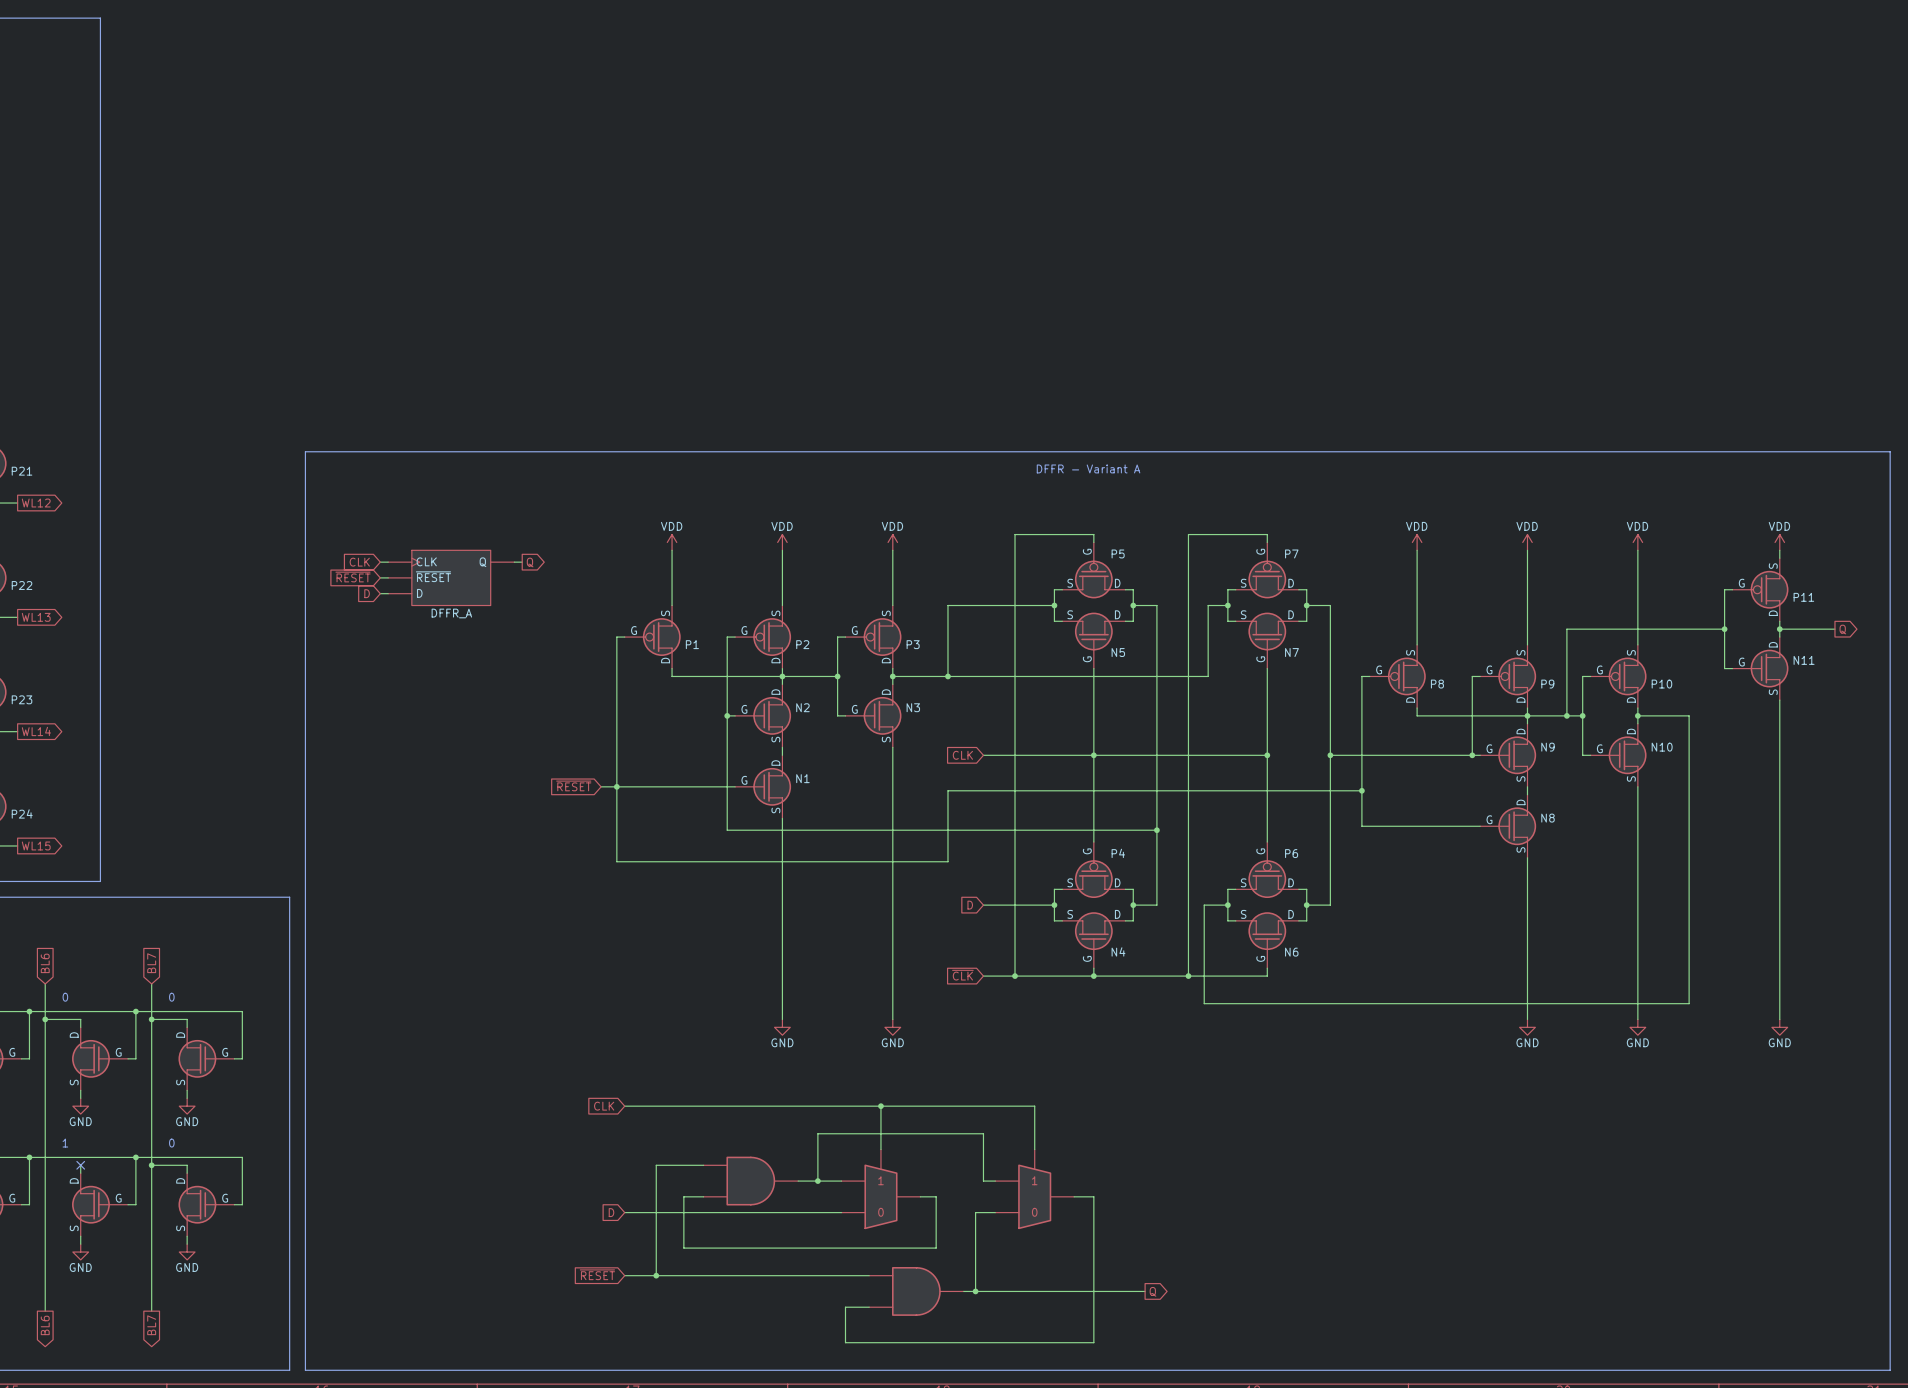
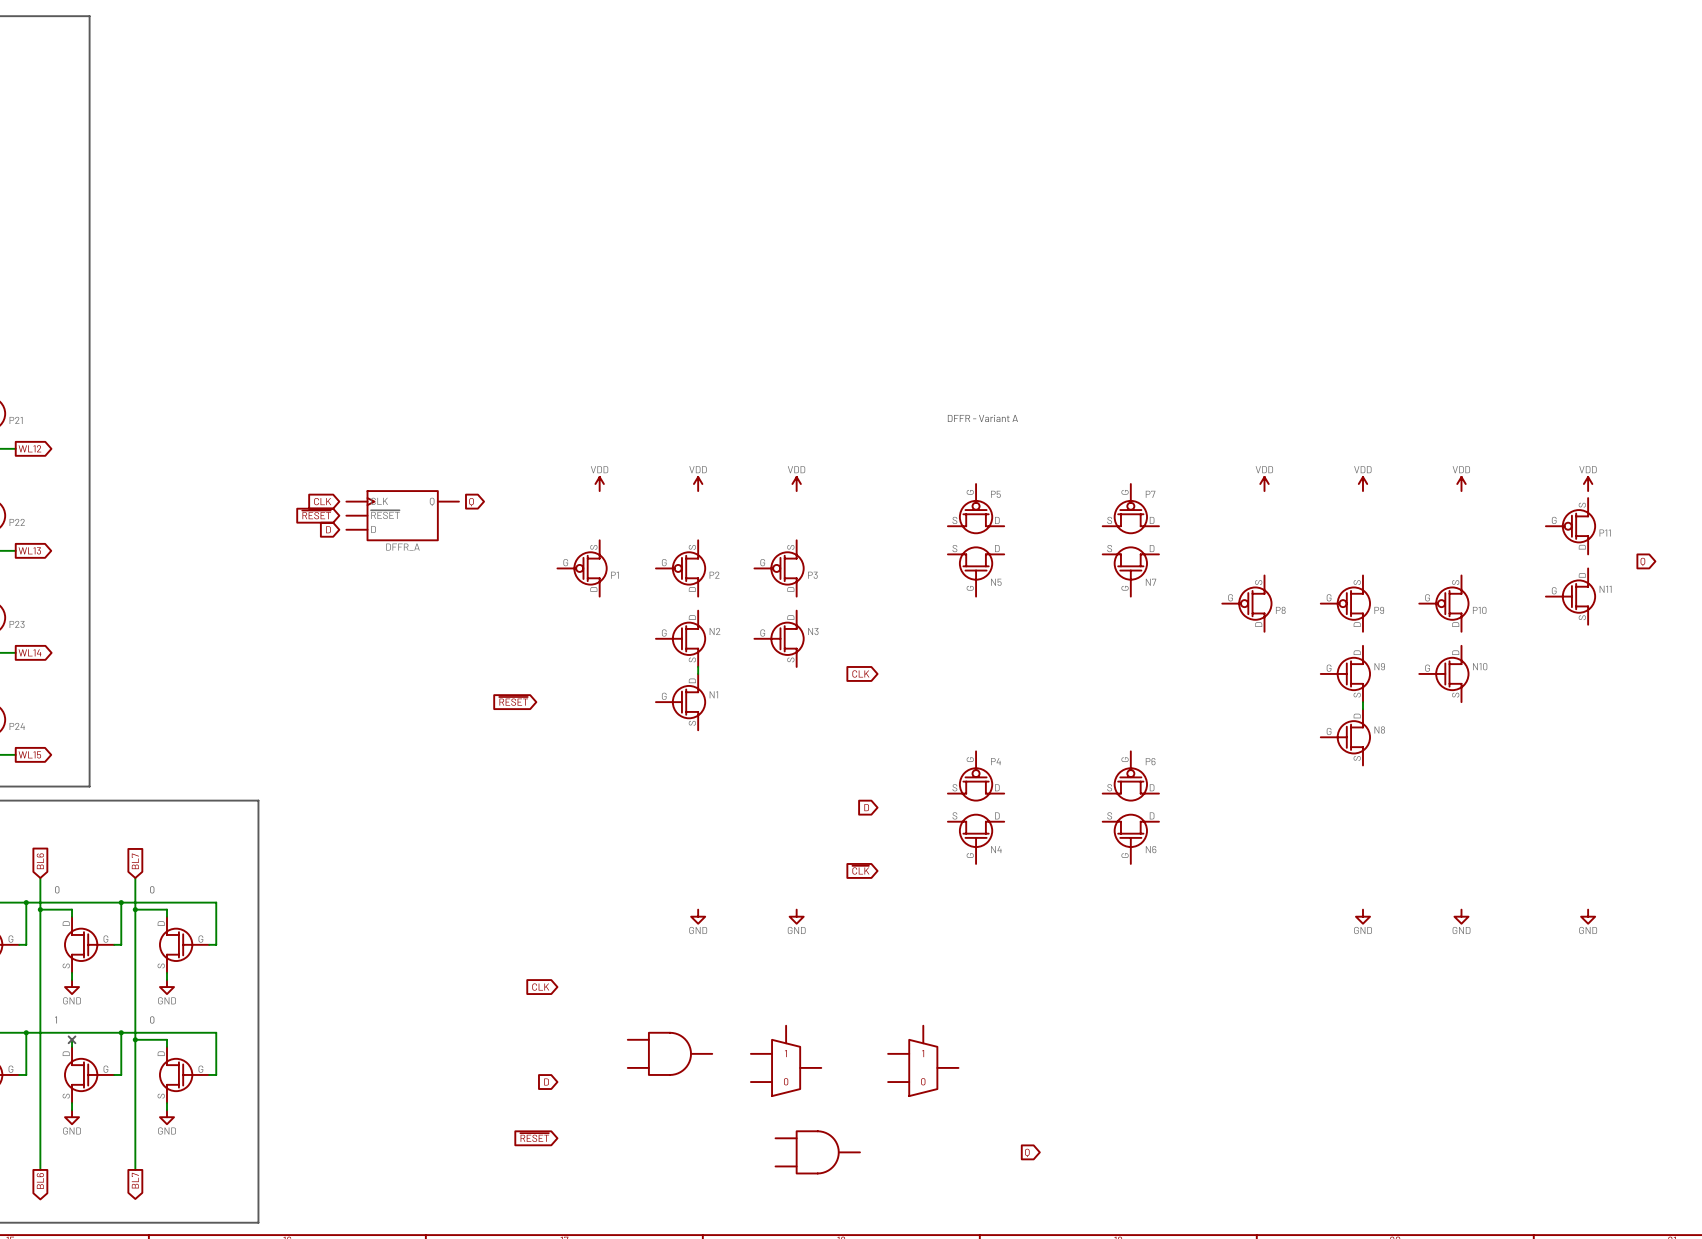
line: (305, 451) (1890, 451) (1890, 1370) (305, 1370) (305, 451) -> none
wire: (1093, 542) (1093, 534) (1015, 534) (1015, 976) -> none
wire: (1267, 542) (1267, 534) (1188, 534) (1188, 976) -> none
wire: (672, 550) (672, 605) -> none
wire: (782, 550) (782, 605) -> none
wire: (892, 550) (892, 605) -> none
wire: (1417, 550) (1417, 644) -> none
wire: (1527, 550) (1527, 644) -> none
wire: (1637, 550) (1637, 644) -> none
wire: (1779, 550) (1779, 558) -> none
wire: (380, 562) (388, 562) -> none
wire: (514, 562) (522, 562) -> none
wire: (380, 577) (388, 577) -> none
wire: (1062, 589) (1054, 589) (1054, 621) (1062, 621) -> none
wire: (1125, 589) (1133, 589) (1133, 621) (1125, 621) -> none
wire: (1235, 589) (1227, 589) (1227, 621) (1235, 621) -> none
wire: (1298, 589) (1306, 589) (1306, 621) (1298, 621) -> none
wire: (1732, 589) (1724, 589) (1724, 668) (1732, 668) -> none
wire: (380, 593) (388, 593) -> none
wire: (1054, 605) (947, 605) (947, 676) -> none
junction: (1054, 605) -> none
wire: (1133, 605) (1156, 605) (1156, 905) (1133, 905) -> none
junction: (1133, 605) -> none
wire: (1227, 605) (1208, 605) (1208, 676) (892, 676) -> none
junction: (1227, 605) -> none
wire: (1306, 605) (1330, 605) (1330, 905) (1306, 905) -> none
junction: (1306, 605) -> none
wire: (1779, 621) (1779, 637) -> none
wire: (1724, 629) (1566, 629) (1566, 715) -> none
junction: (1724, 629) -> none
wire: (1779, 629) (1834, 629) -> none
junction: (1779, 629) -> none
wire: (624, 637) (616, 637) (616, 861) (947, 861) (947, 790) (1361, 790) -> none
wire: (735, 637) (727, 637) (727, 830) (1156, 830) -> none
wire: (845, 637) (837, 637) (837, 715) (845, 715) -> none
wire: (672, 668) (672, 676) (837, 676) -> none
wire: (782, 668) (782, 684) -> none
wire: (892, 668) (892, 684) -> none
wire: (1093, 668) (1093, 842) -> none
wire: (1267, 668) (1267, 842) -> none
junction: (782, 676) -> none
junction: (837, 676) -> none
junction: (892, 676) -> none
junction: (947, 676) -> none
wire: (1369, 676) (1361, 676) (1361, 826) (1480, 826) -> none
wire: (1480, 676) (1472, 676) (1472, 755) -> none
wire: (1590, 676) (1582, 676) (1582, 755) (1590, 755) -> none
wire: (1779, 700) (1779, 1019) -> none
wire: (1417, 708) (1417, 715) (1582, 715) -> none
wire: (1527, 708) (1527, 723) -> none
wire: (1637, 708) (1637, 723) -> none
wire: (727, 715) (735, 715) -> none
junction: (727, 715) -> none
junction: (1527, 715) -> none
junction: (1566, 715) -> none
junction: (1582, 715) -> none
wire: (1637, 715) (1689, 715) (1689, 1003) (1204, 1003) (1204, 905) (1227, 905) -> none
junction: (1637, 715) -> none
wire: (892, 747) (892, 1019) -> none
wire: (983, 755) (1267, 755) -> none
junction: (1093, 755) -> none
junction: (1267, 755) -> none
wire: (1330, 755) (1480, 755) -> none
junction: (1330, 755) -> none
junction: (1472, 755) -> none
wire: (601, 786) (735, 786) -> none
junction: (616, 786) -> none
wire: (1637, 786) (1637, 1019) -> none
junction: (1361, 790) -> none
wire: (782, 818) (782, 1019) -> none
junction: (1156, 830) -> none
wire: (1527, 857) (1527, 1019) -> none
wire: (1062, 889) (1054, 889) (1054, 920) (1062, 920) -> none
wire: (1125, 889) (1133, 889) (1133, 920) (1125, 920) -> none
wire: (1235, 889) (1227, 889) (1227, 920) (1235, 920) -> none
wire: (1298, 889) (1306, 889) (1306, 920) (1298, 920) -> none
wire: (983, 905) (1054, 905) -> none
junction: (1054, 905) -> none
junction: (1133, 905) -> none
junction: (1227, 905) -> none
junction: (1306, 905) -> none
wire: (1093, 968) (1093, 976) -> none
wire: (1267, 968) (1267, 976) (983, 976) -> none
junction: (1015, 976) -> none
junction: (1093, 976) -> none
junction: (1188, 976) -> none
wire: (624, 1106) (1034, 1106) (1034, 1149) -> none
wire: (880, 1106) (880, 1149) -> none
junction: (880, 1106) -> none
wire: (703, 1165) (656, 1165) (656, 1275) -> none
wire: (798, 1181) (841, 1181) -> none
wire: (817, 1181) (817, 1133) (983, 1133) (983, 1181) (995, 1181) -> none
junction: (817, 1181) -> none
wire: (703, 1196) (683, 1196) (683, 1248) (936, 1248) (936, 1196) (920, 1196) -> none
wire: (1074, 1196) (1093, 1196) (1093, 1342) (845, 1342) (845, 1307) (869, 1307) -> none
wire: (624, 1212) (841, 1212) -> none
wire: (995, 1212) (975, 1212) (975, 1291) -> none
wire: (624, 1275) (869, 1275) -> none
junction: (656, 1275) -> none
wire: (963, 1291) (1145, 1291) -> none
junction: (975, 1291) -> none

